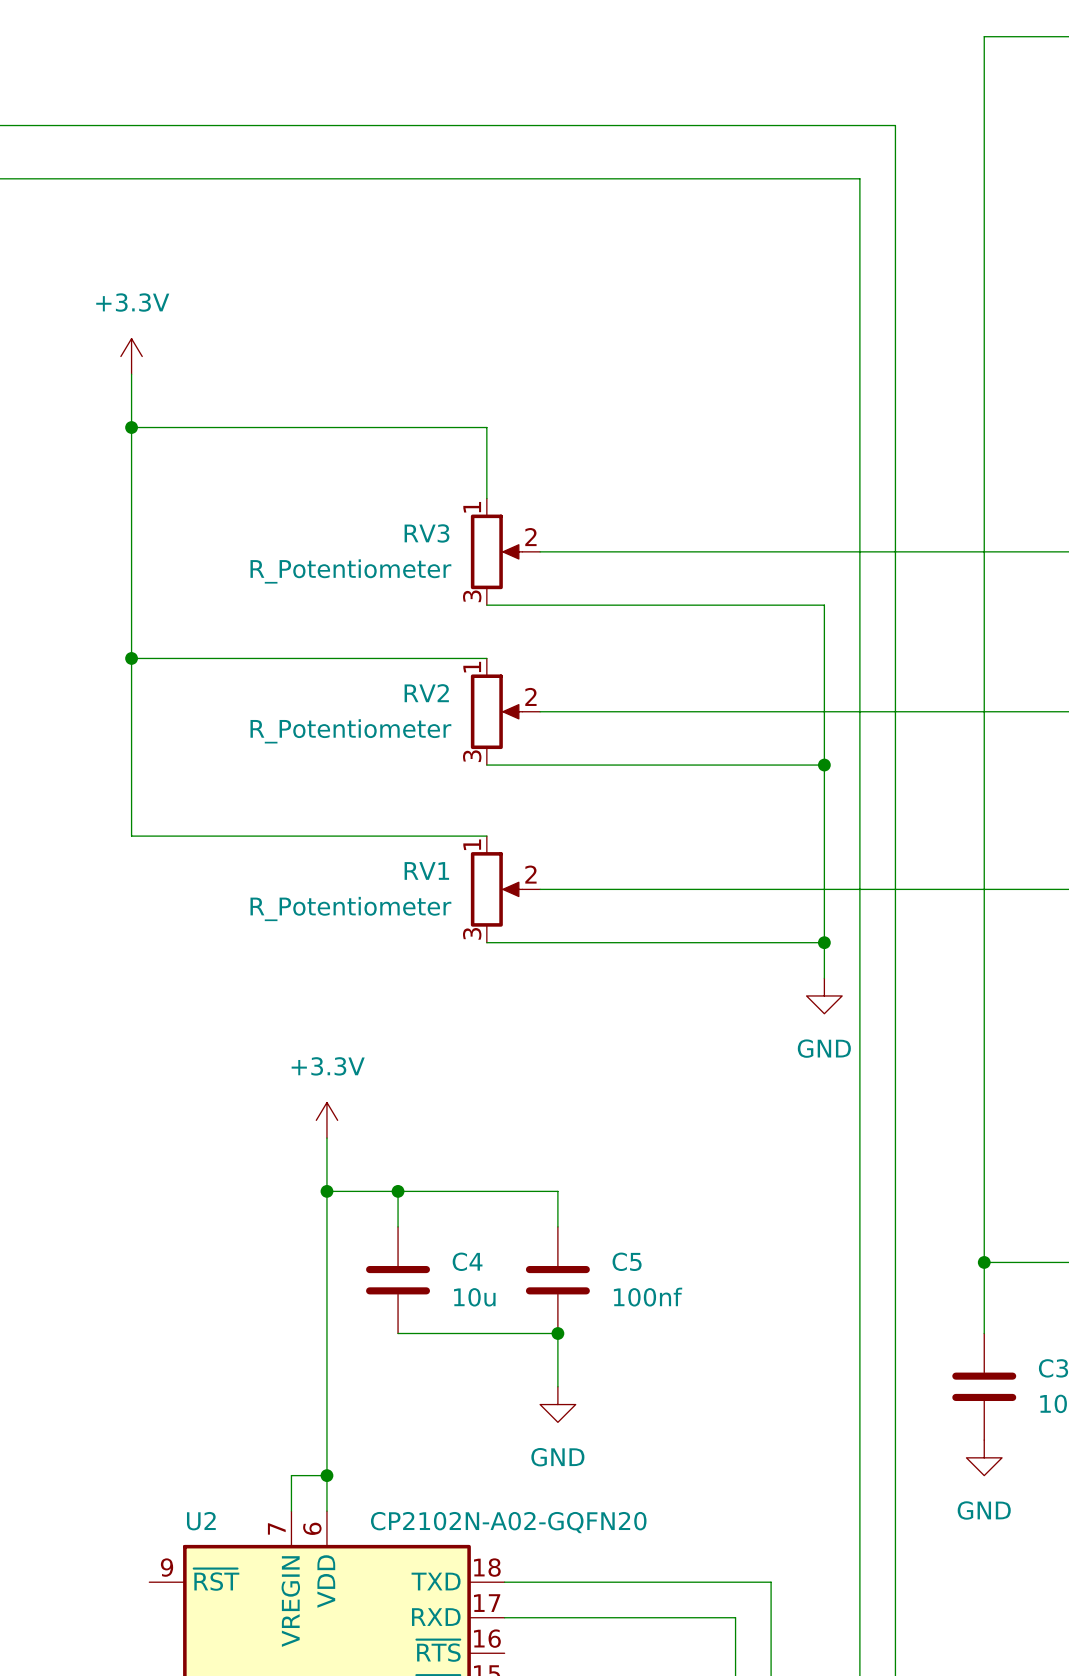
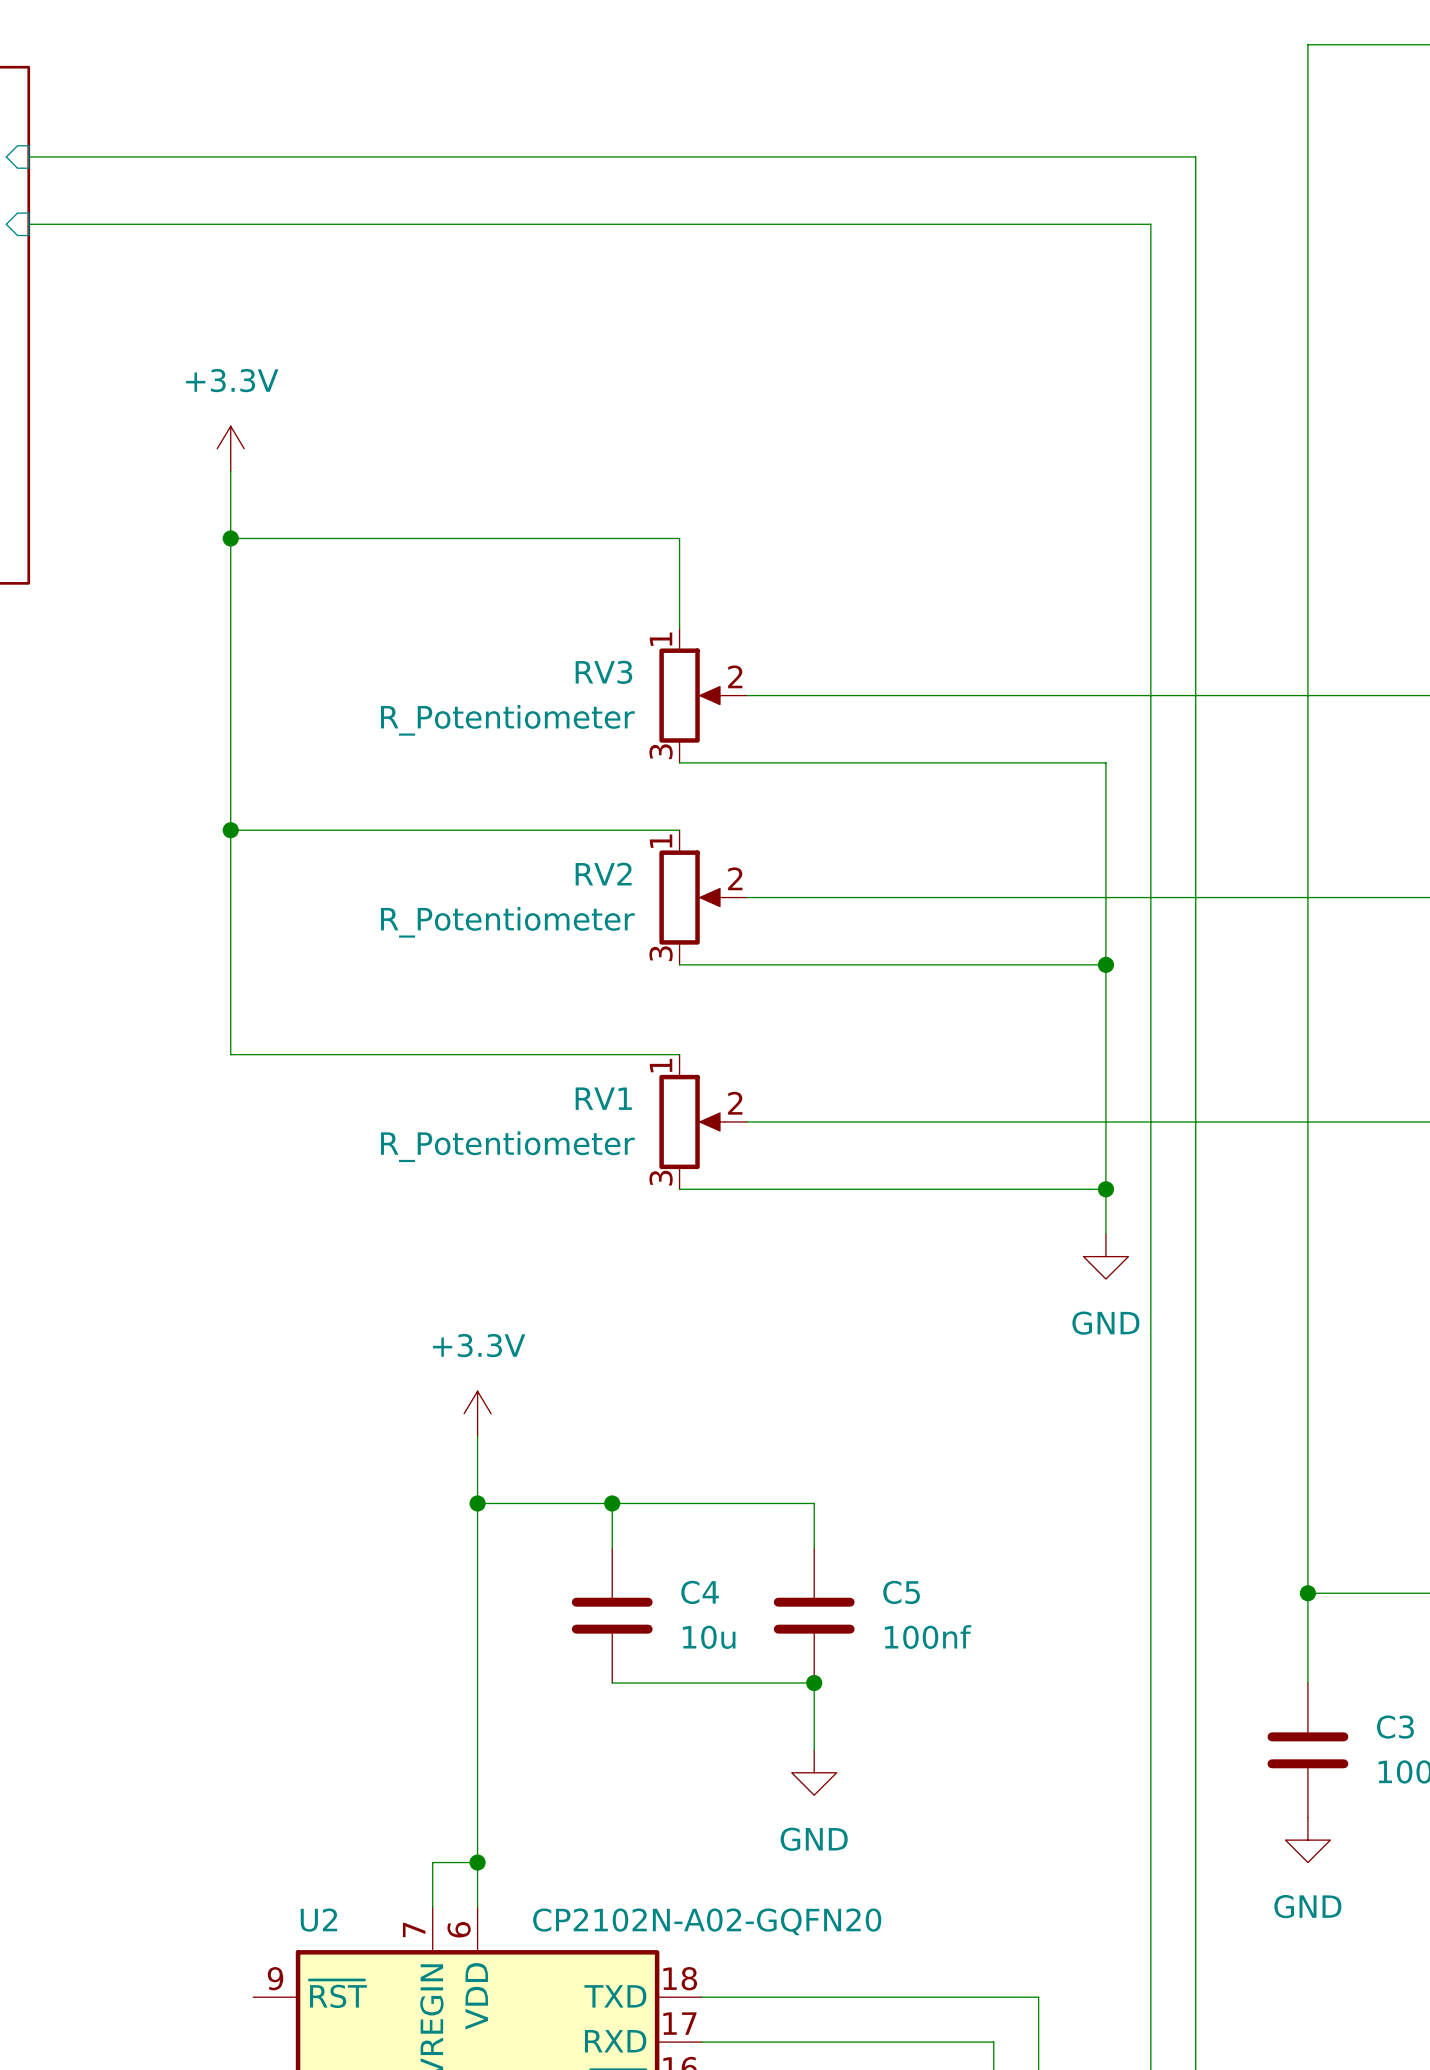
wire: (398, 1191) (398, 1226) -> (612, 1503) (612, 1548)
junction position: (398, 1191) -> (612, 1503)
wire: (557, 1191) (557, 1226) -> (769, 1503) (814, 1503) (814, 1548)
C4 position: (398, 1280) -> (612, 1615)
C5 position: (557, 1280) -> (814, 1615)
wire: (398, 1333) (433, 1333) -> none
wire: (557, 1333) (557, 1386) -> (769, 1683) (814, 1683) (814, 1750)
junction position: (557, 1333) -> (814, 1683)
power symbol position: GND (557, 1404) -> GND (814, 1772)

